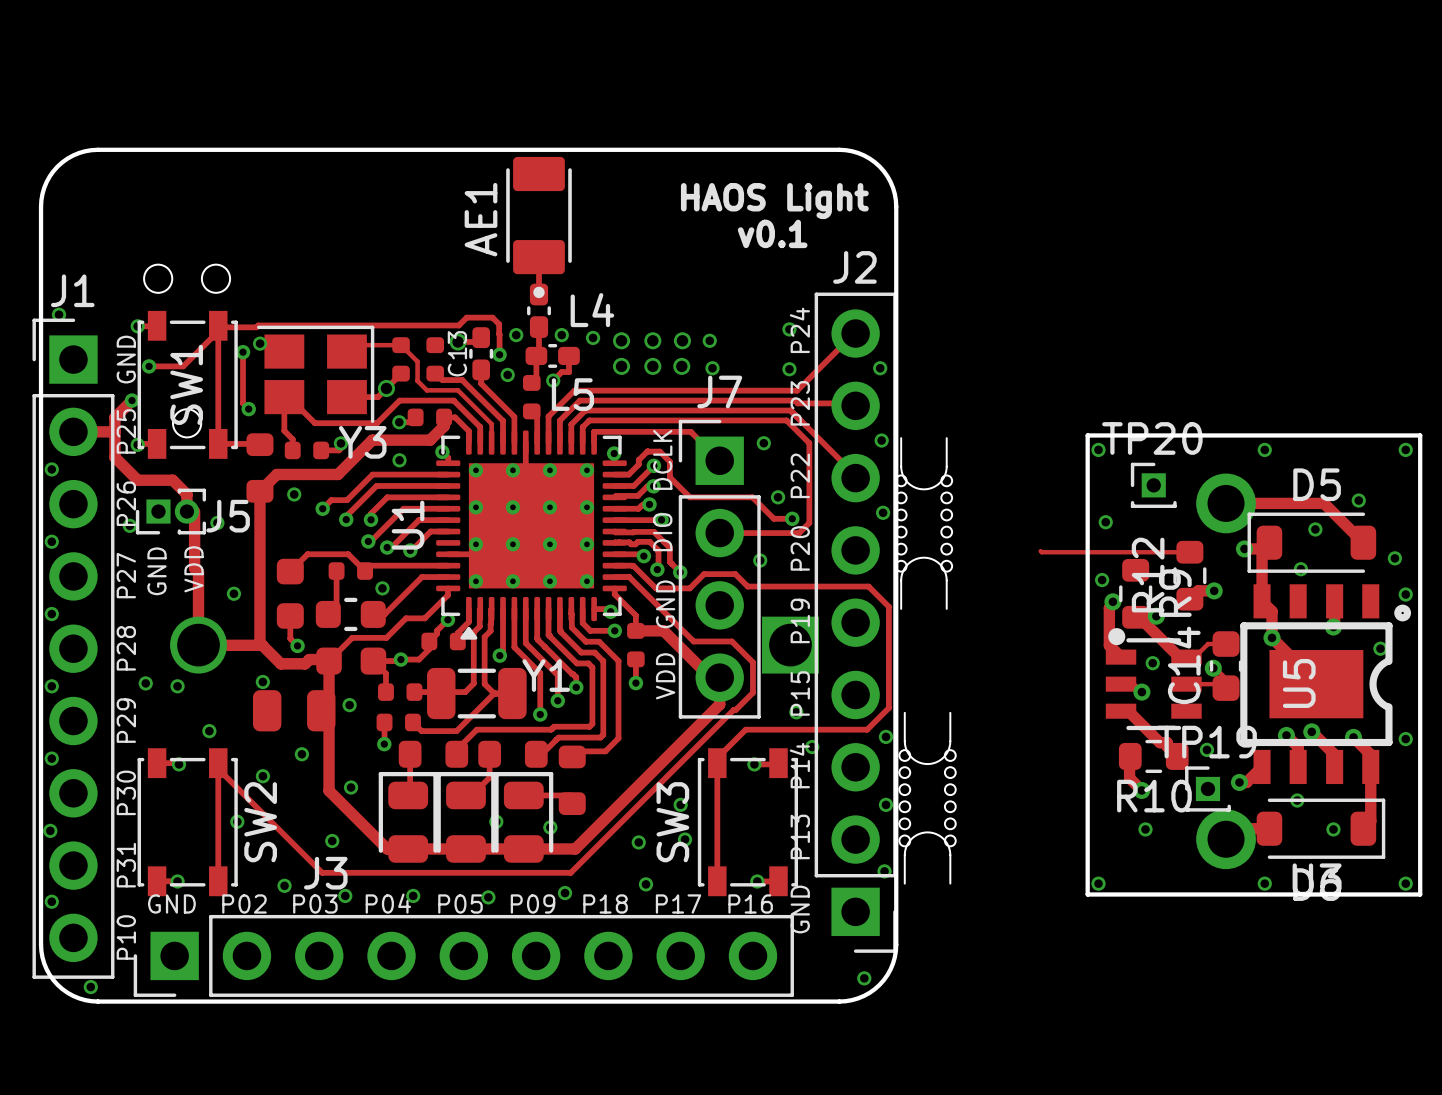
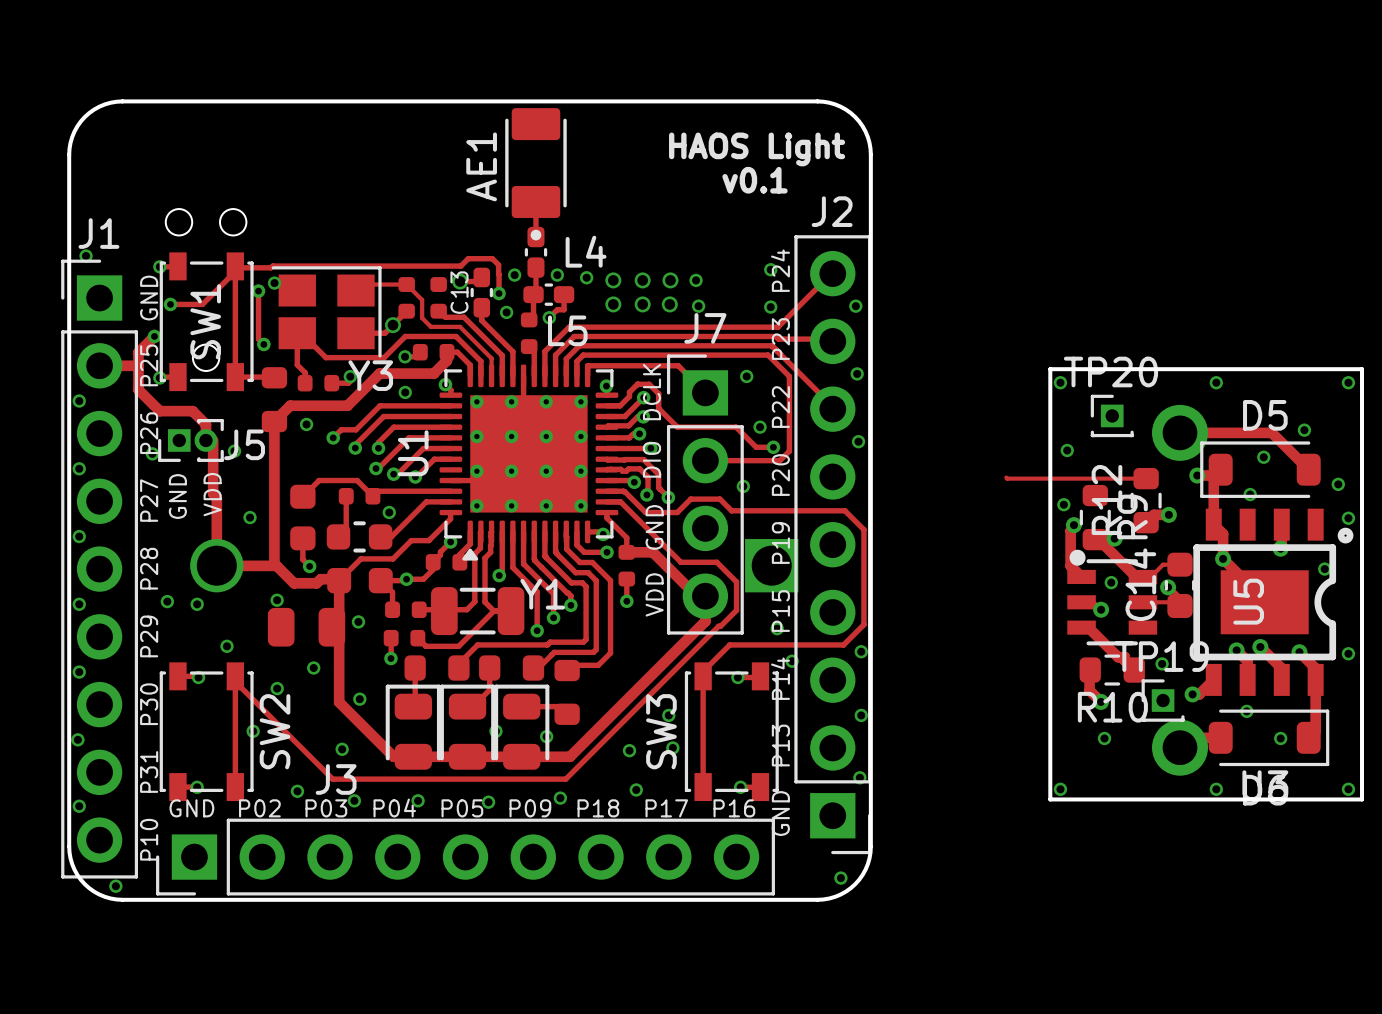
part: (923, 523) -> none
part: (927, 798) -> none

